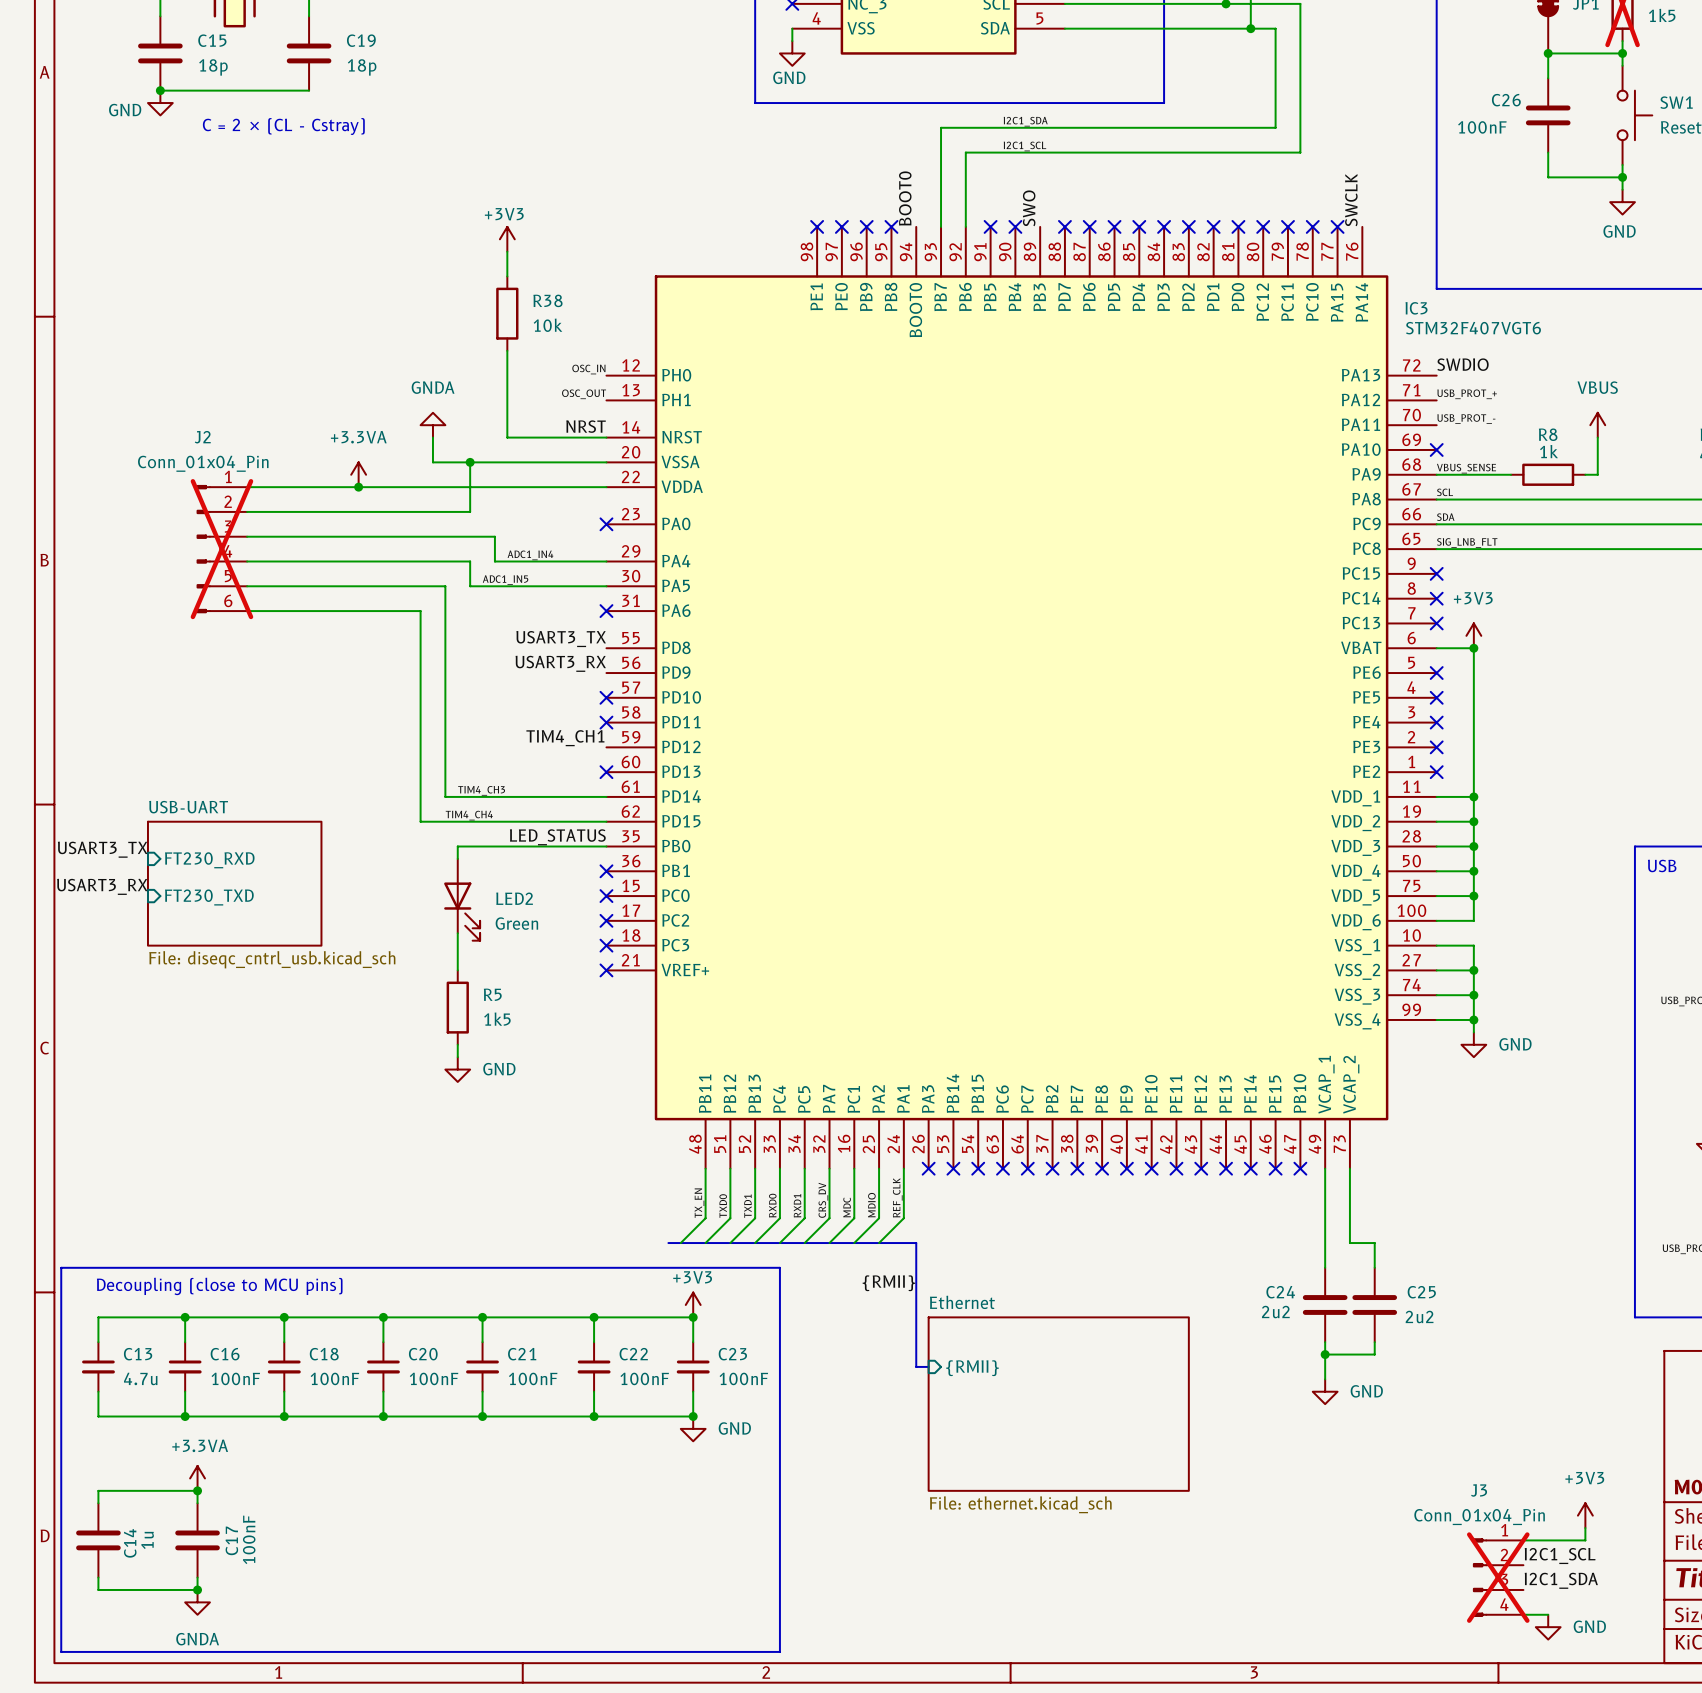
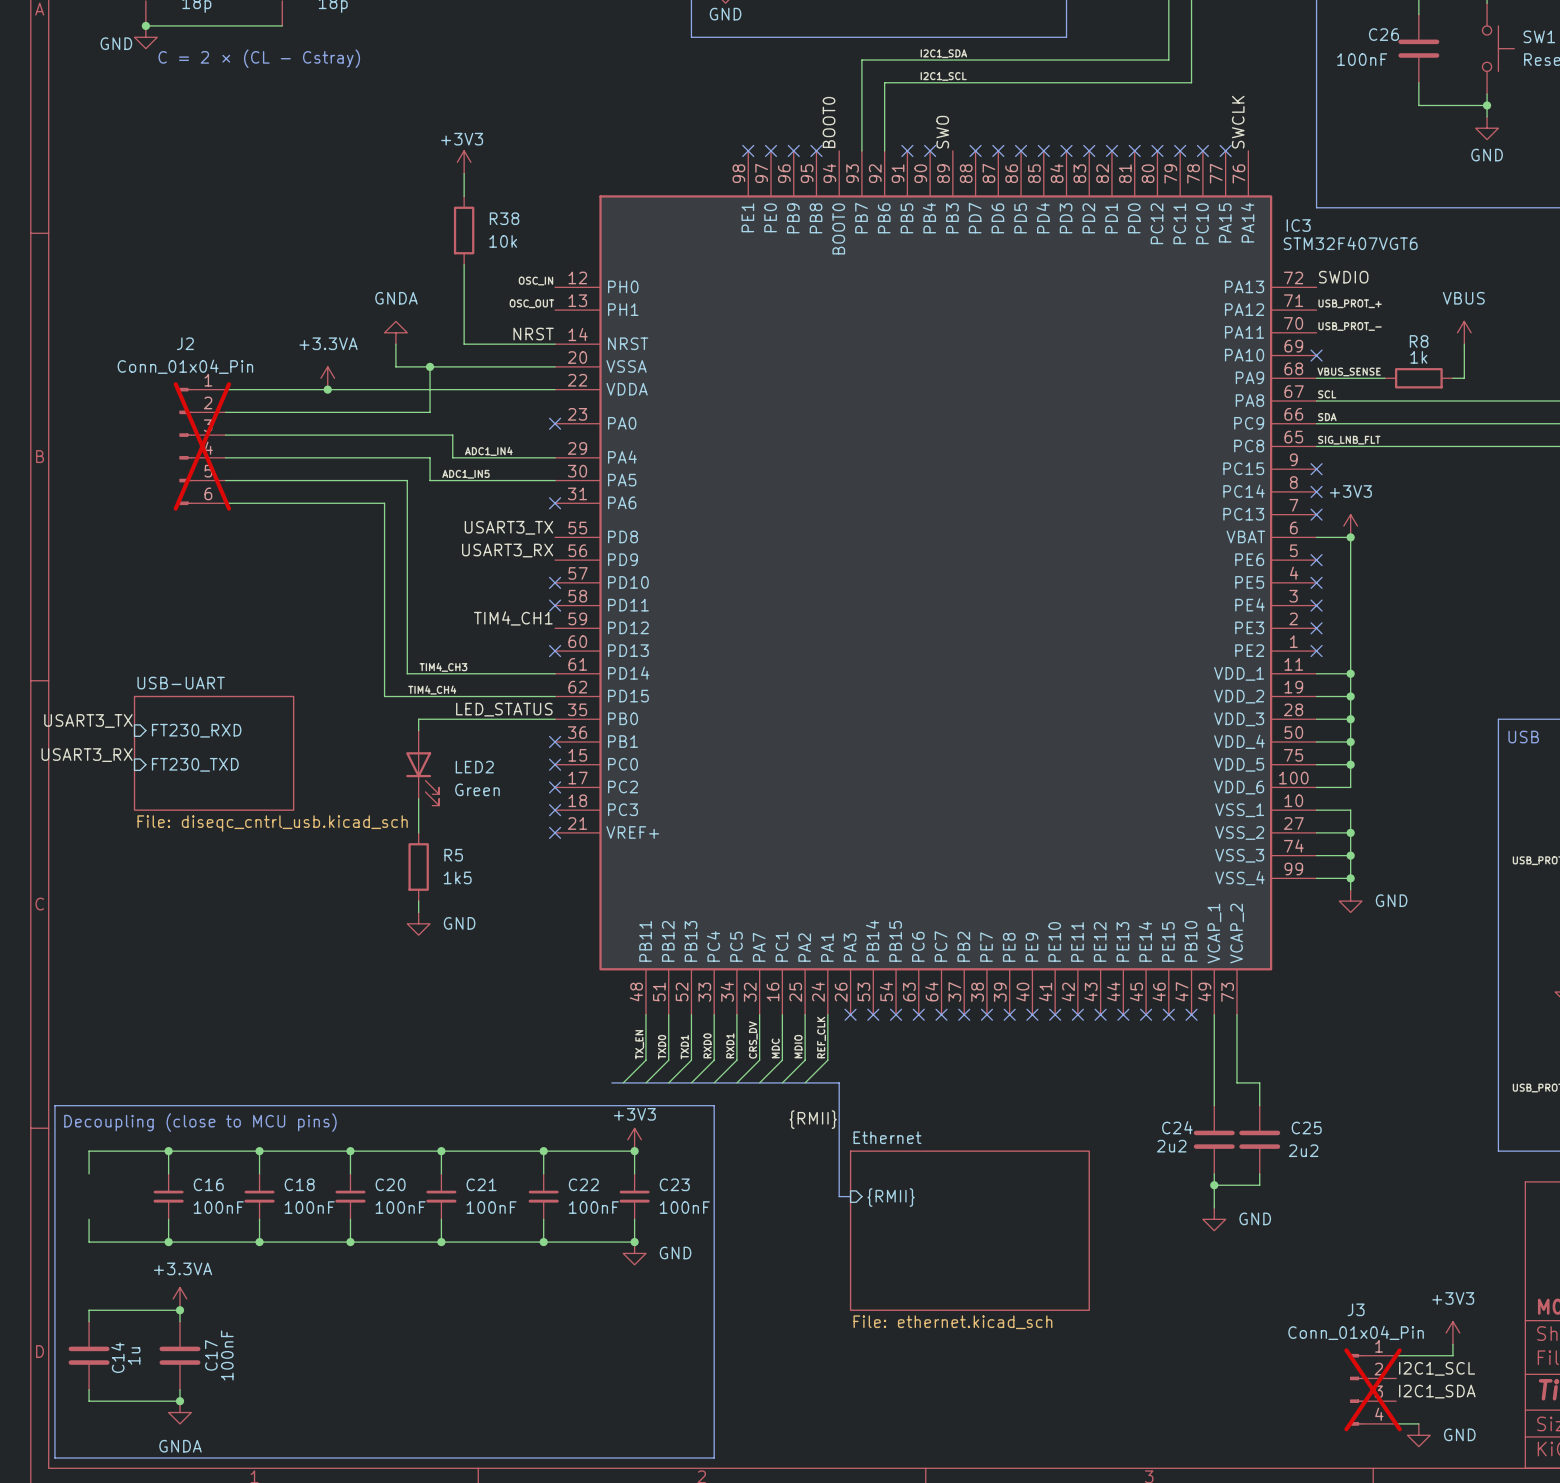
C13: 4.7u (98, 1366) -> none

